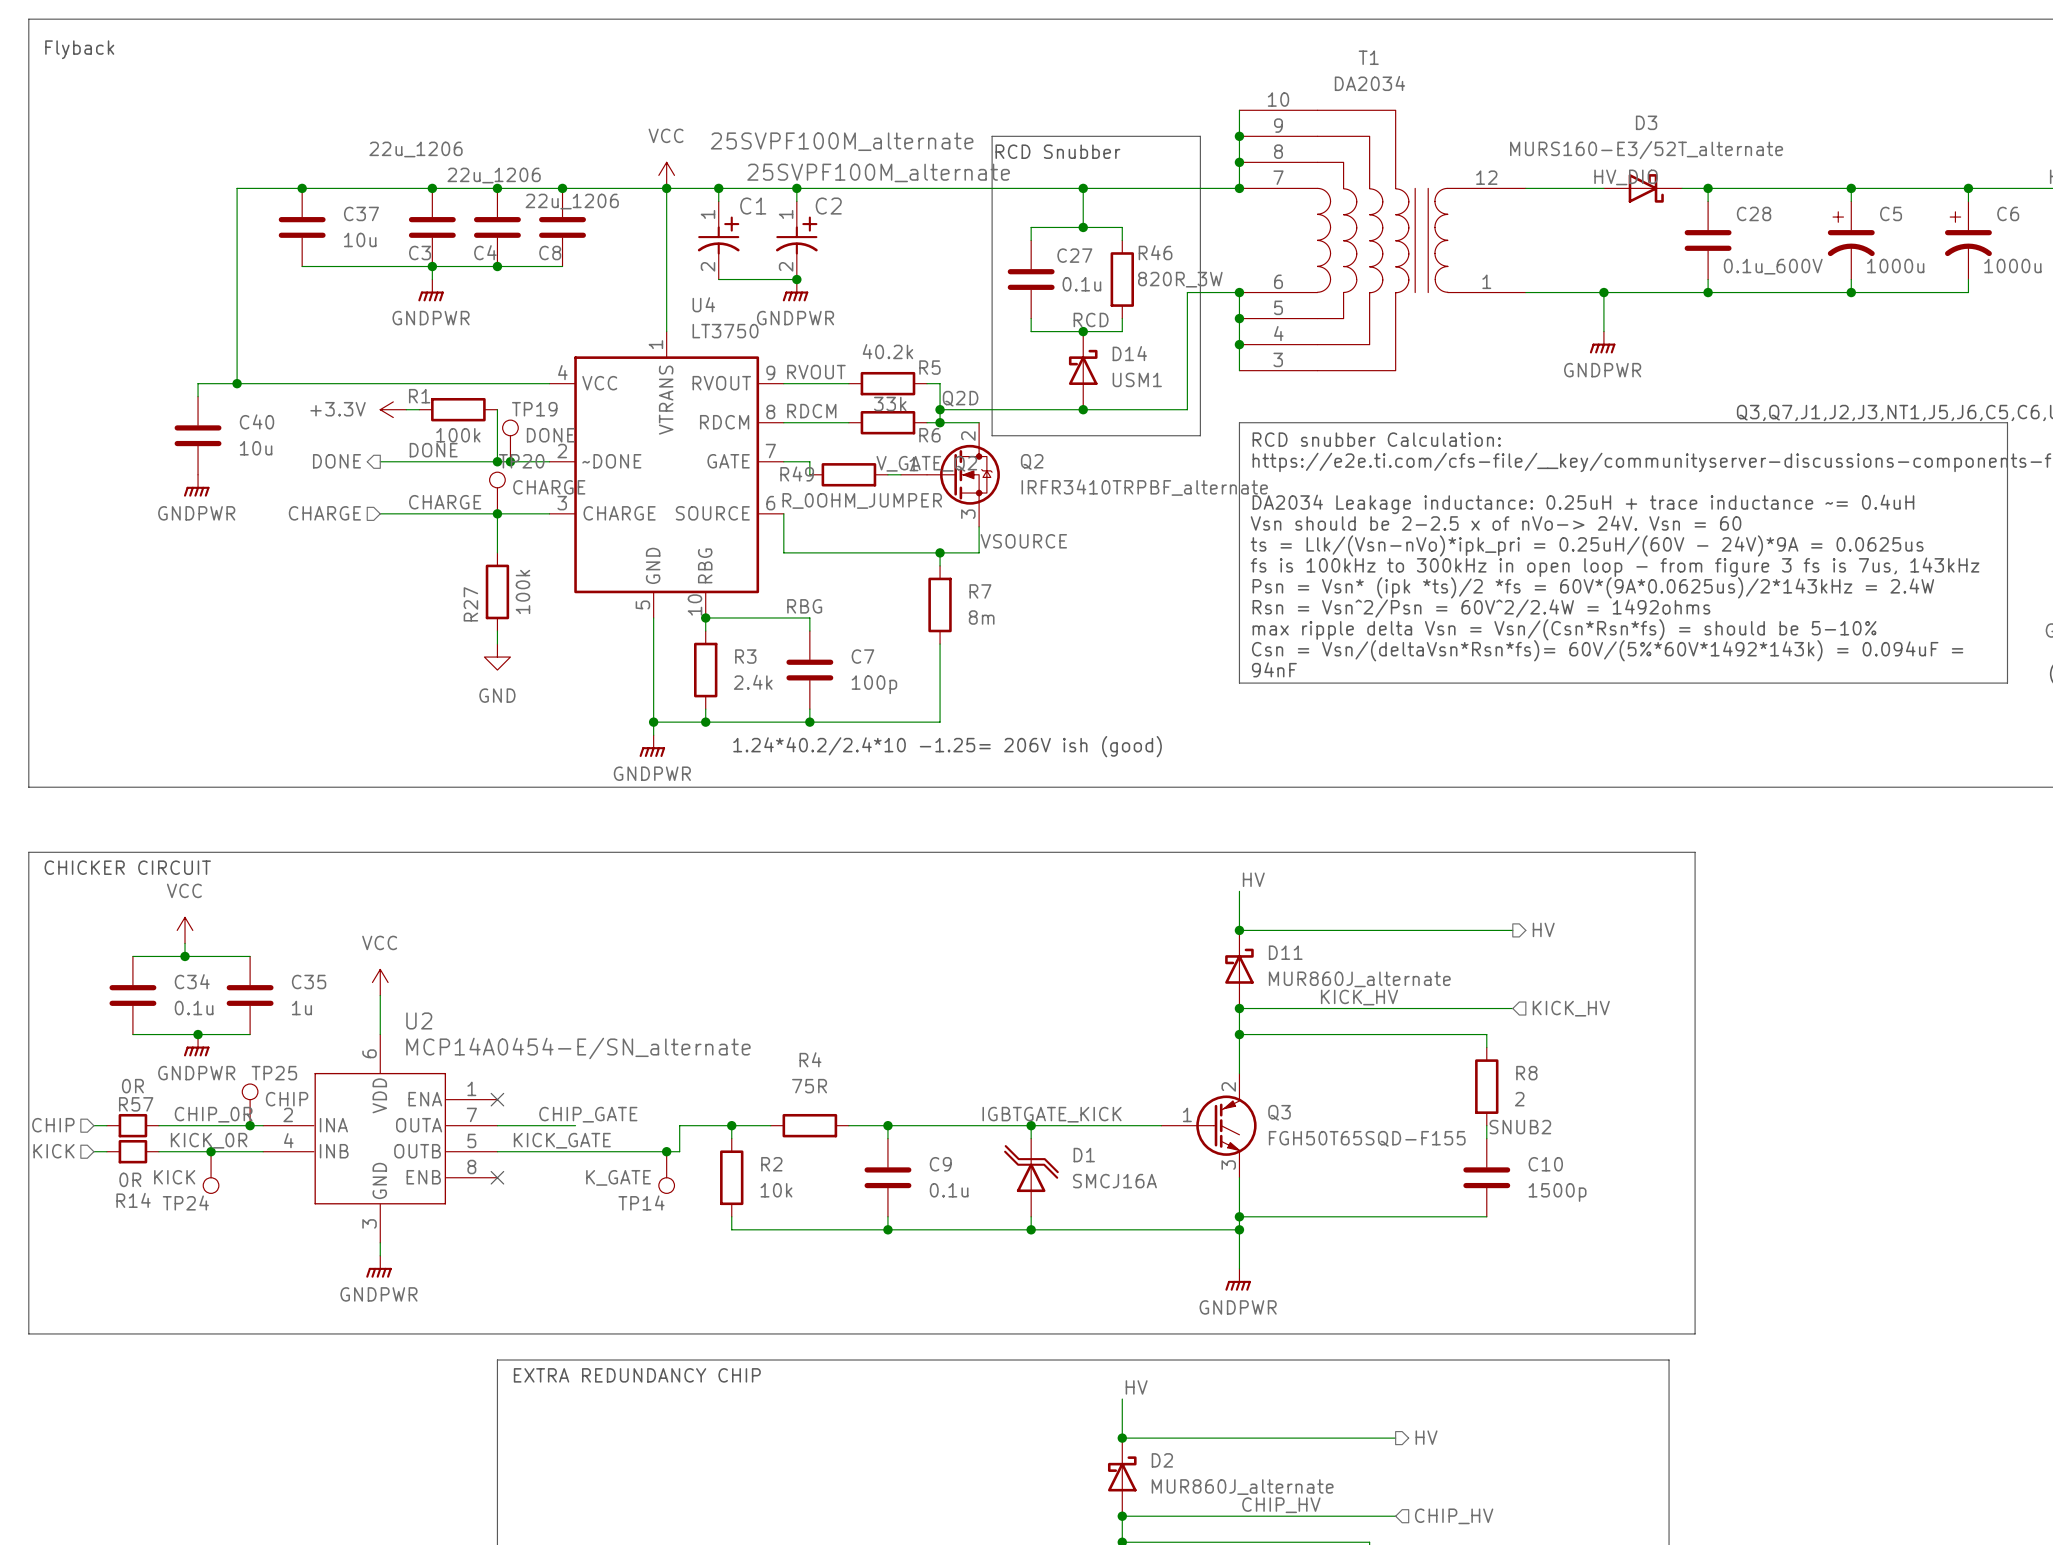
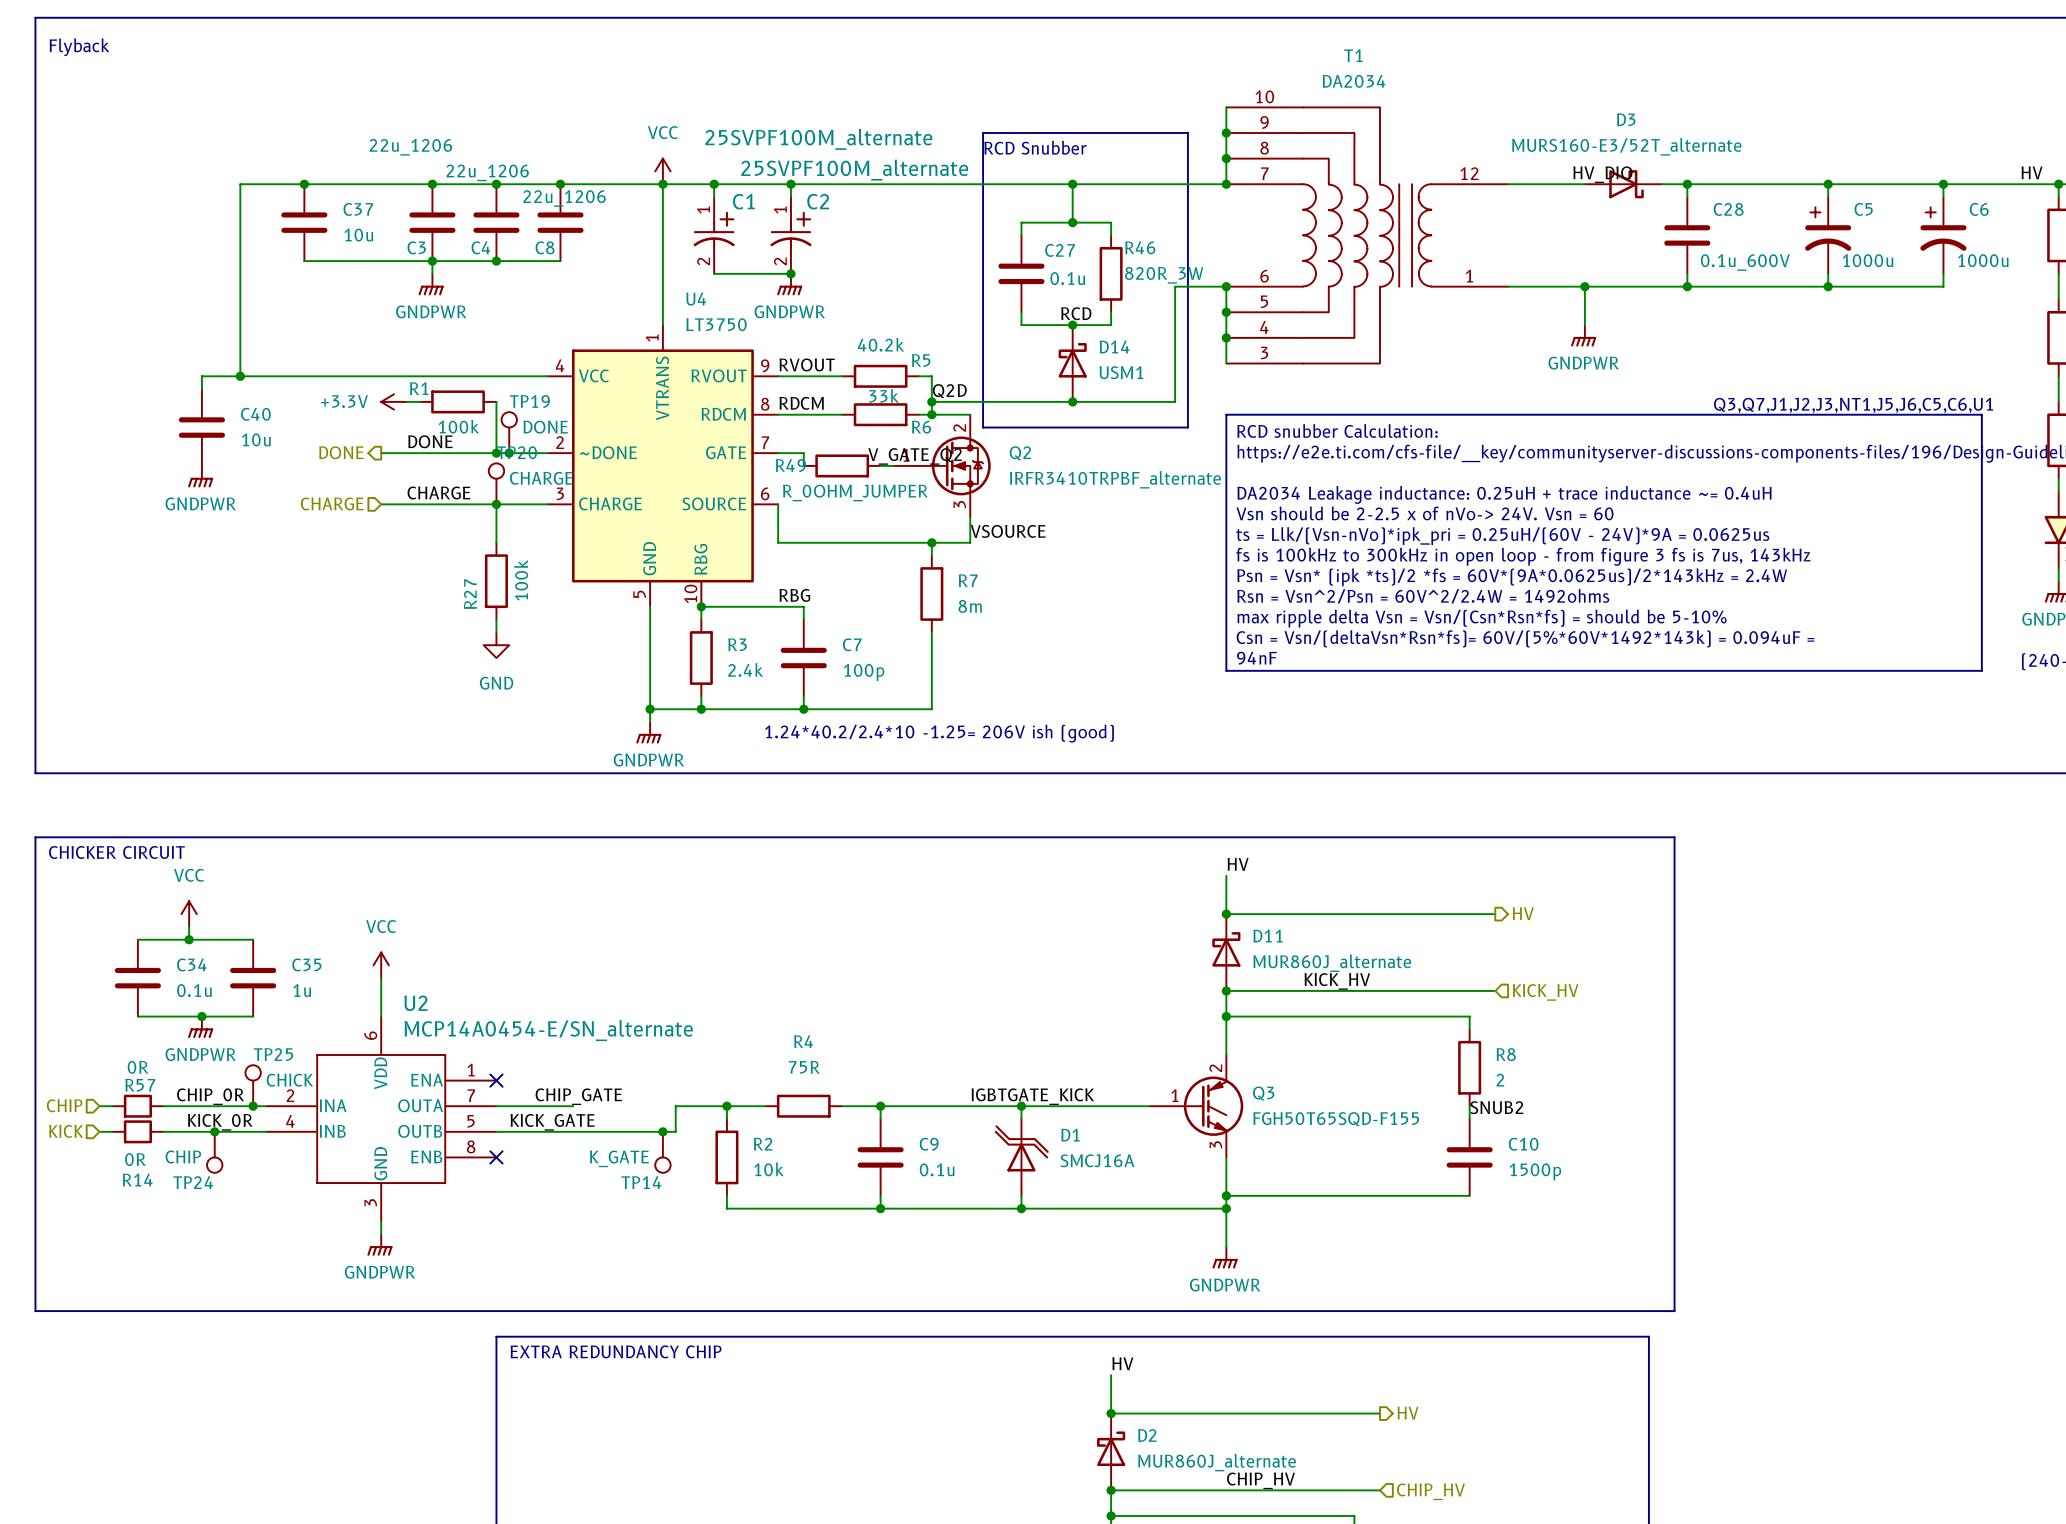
TP25 value: CHIP (287, 1099) -> CHICK (289, 1080)
TP24 value: KICK (174, 1177) -> CHIP (183, 1157)

